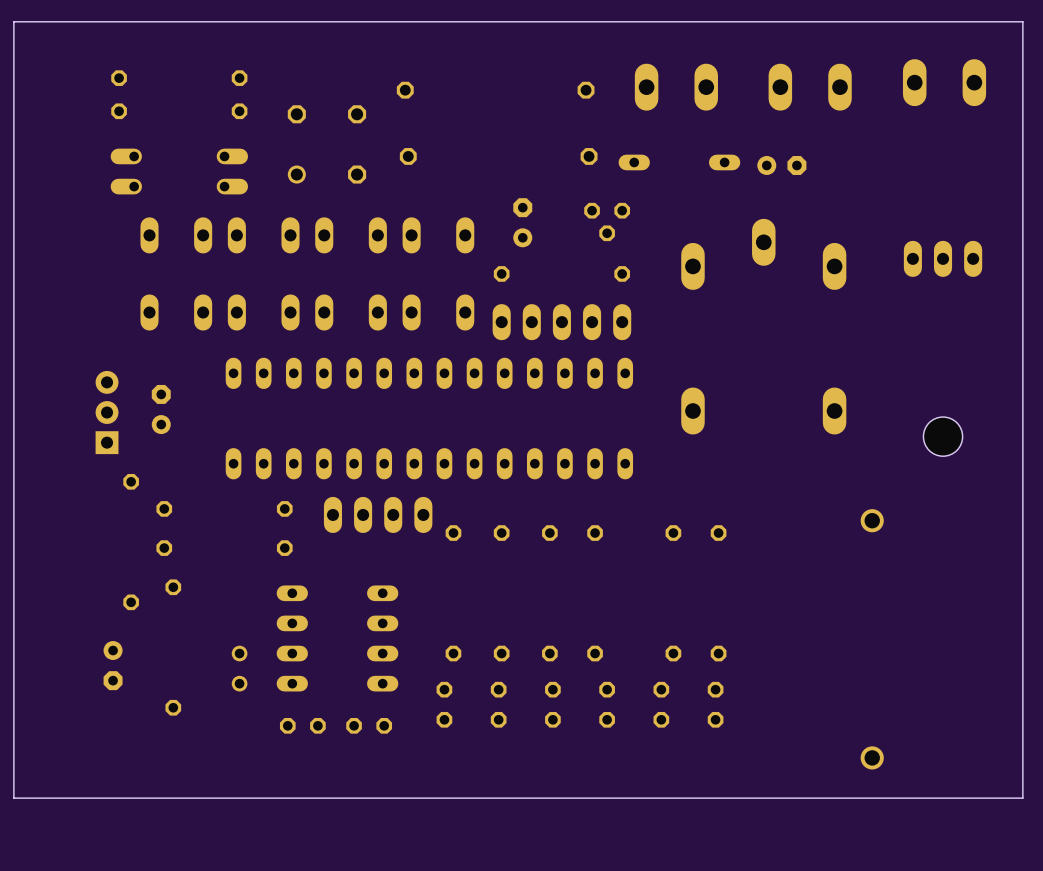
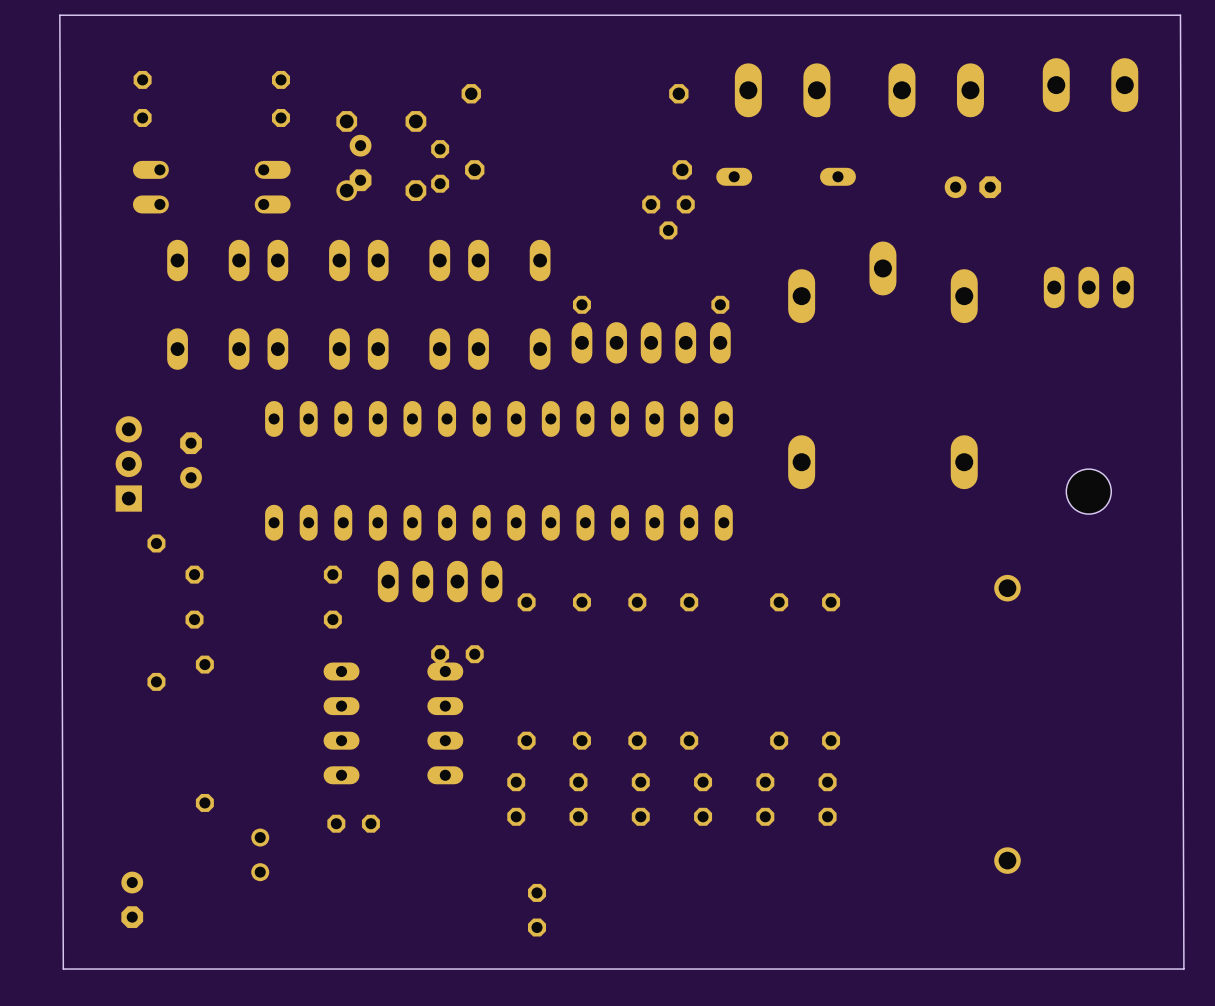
board edge: (1022, 21) (1022, 798) (13, 798) (13, 21) (47, 21) -> (1180, 15) (1183, 969) (63, 969) (59, 15)
part: none -> (360, 162)
part: none -> (440, 166)
part position: (781, 165) -> (972, 187)
part position: (607, 221) -> (668, 217)
part: (522, 222) -> none
part position: (561, 322) -> (651, 342)
part: none -> (457, 654)
part position: (113, 665) -> (132, 899)
part position: (239, 668) -> (260, 854)
part: (369, 725) -> none
part: none -> (537, 910)

